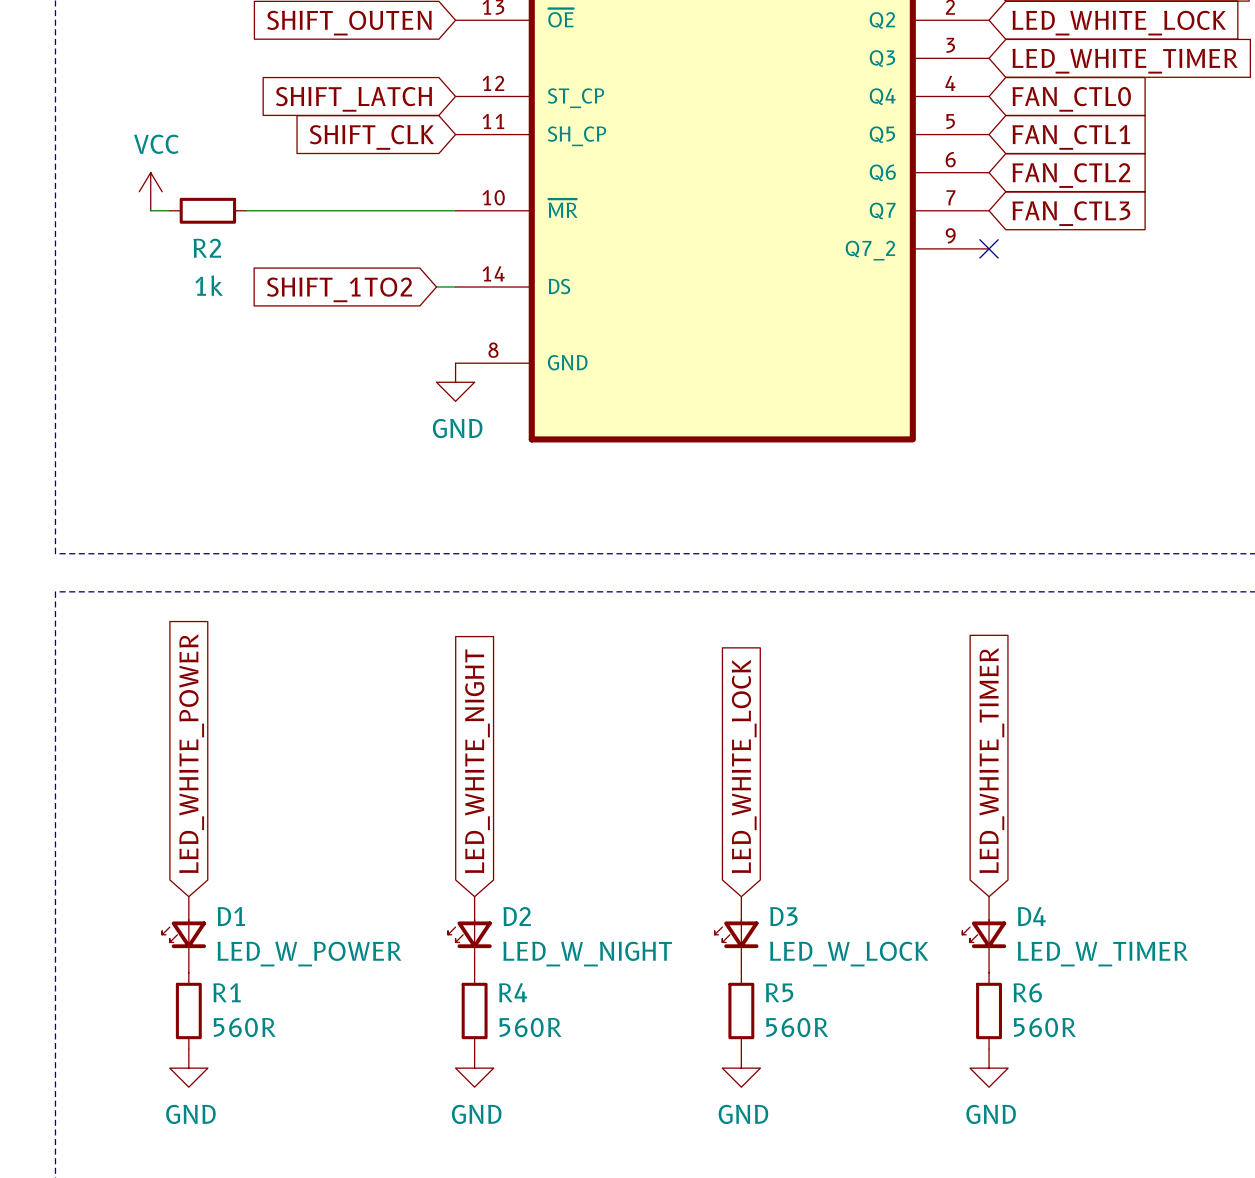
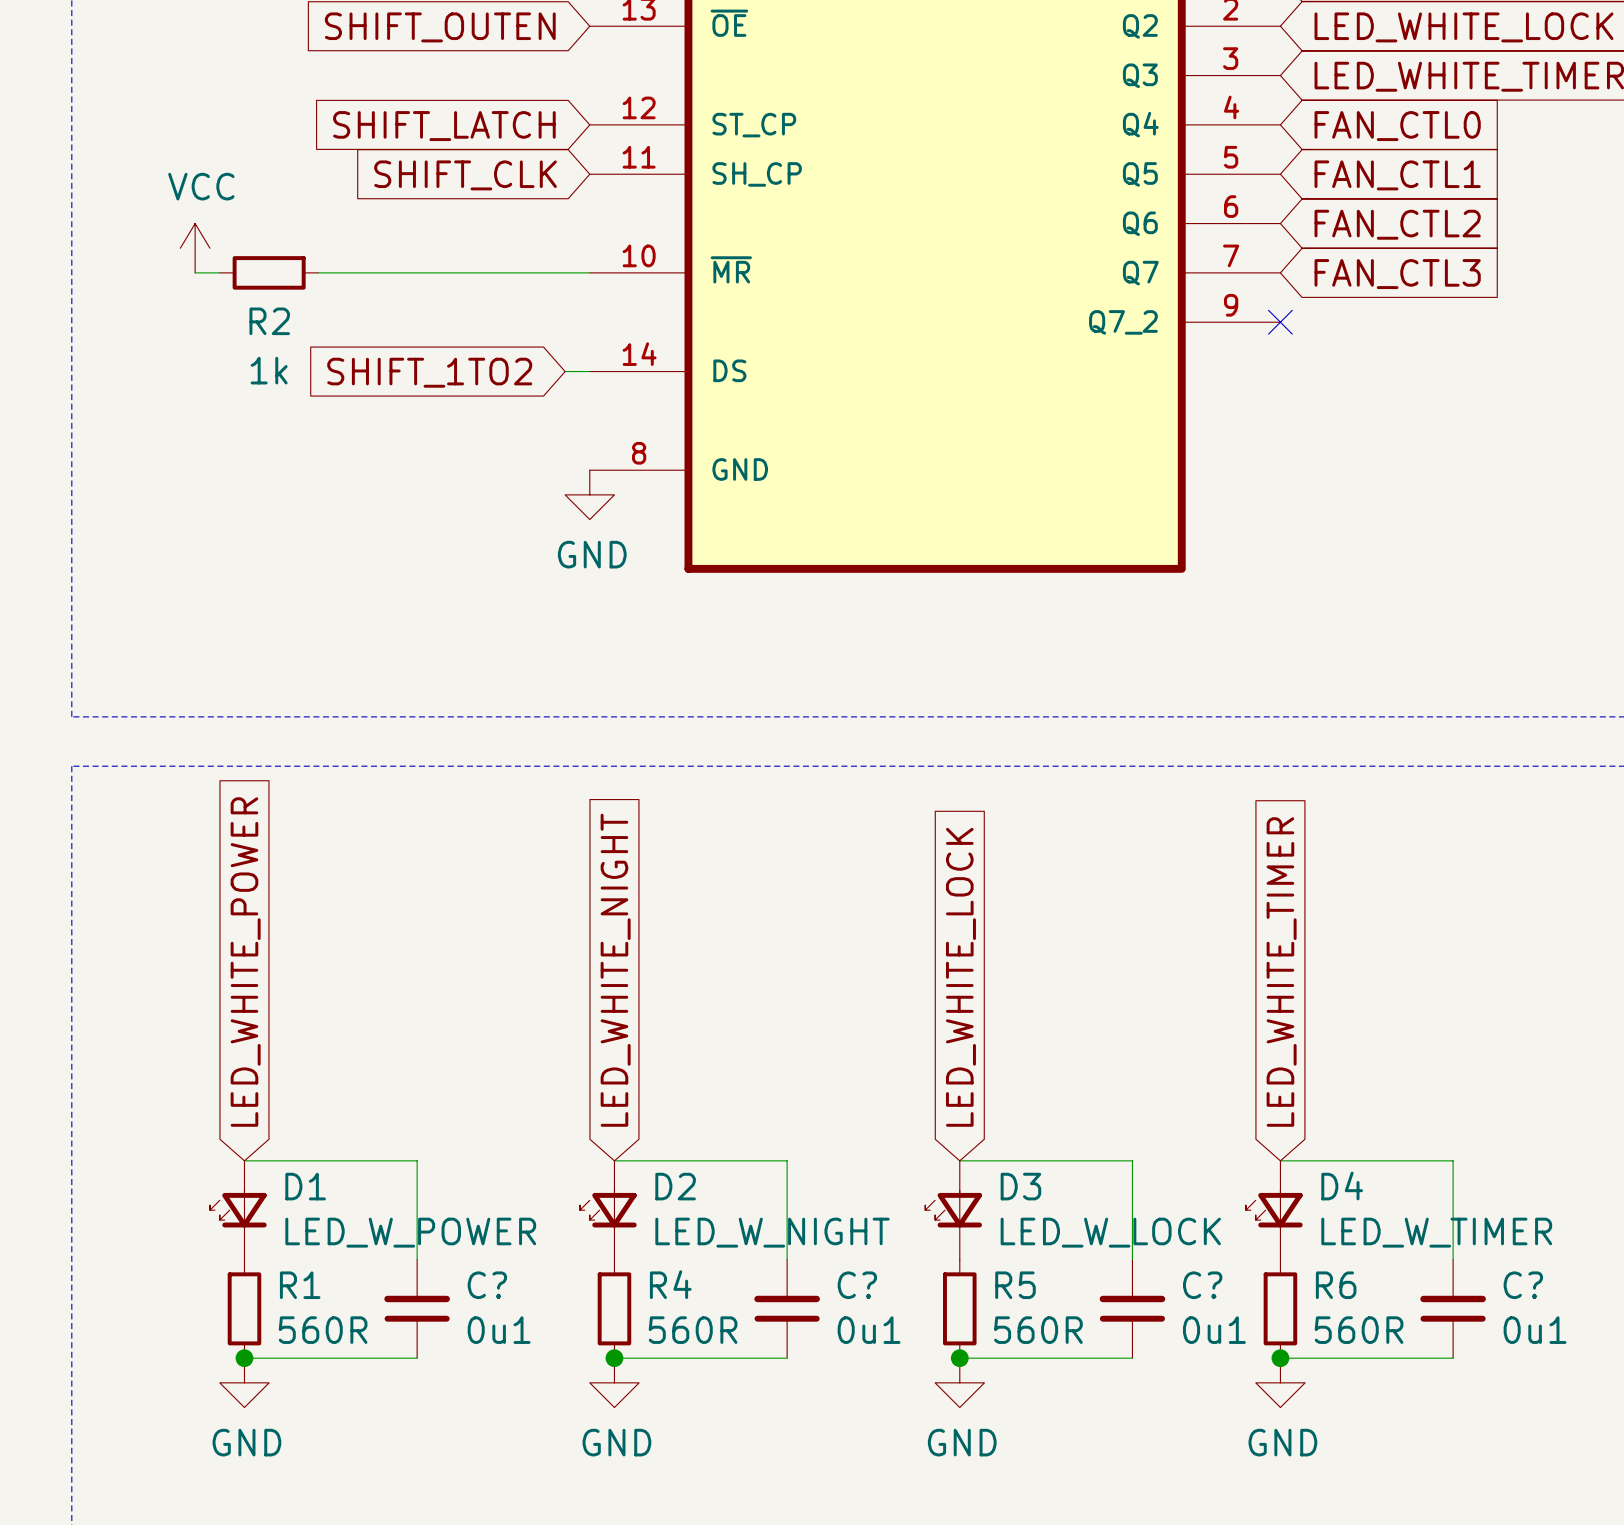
wire: none -> (244, 1160) (417, 1160) (417, 1259)
wire: none -> (614, 1160) (787, 1160) (787, 1259)
wire: none -> (959, 1160) (1132, 1160) (1132, 1259)
wire: none -> (1280, 1160) (1453, 1160) (1453, 1259)
C?: none -> 0u1 (417, 1308)
C?: none -> 0u1 (787, 1308)
C?: none -> 0u1 (1132, 1308)
C?: none -> 0u1 (1453, 1308)
wire: none -> (244, 1358) (417, 1358)
junction: none -> (244, 1358)
wire: none -> (614, 1358) (787, 1358)
junction: none -> (614, 1358)
wire: none -> (959, 1358) (1132, 1358)
junction: none -> (959, 1358)
wire: none -> (1280, 1358) (1453, 1358)
junction: none -> (1280, 1358)

